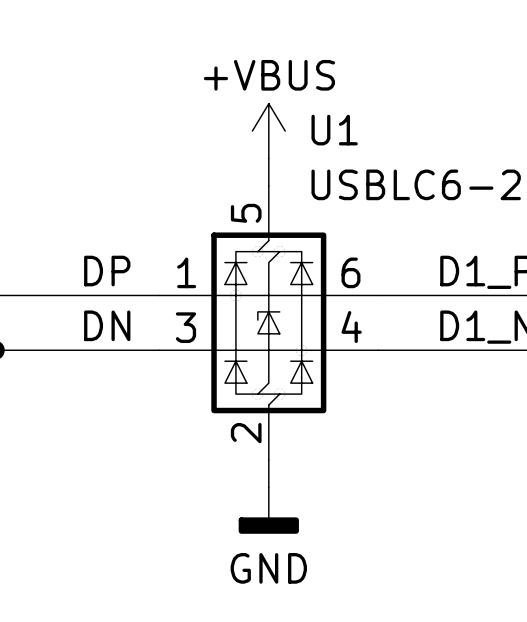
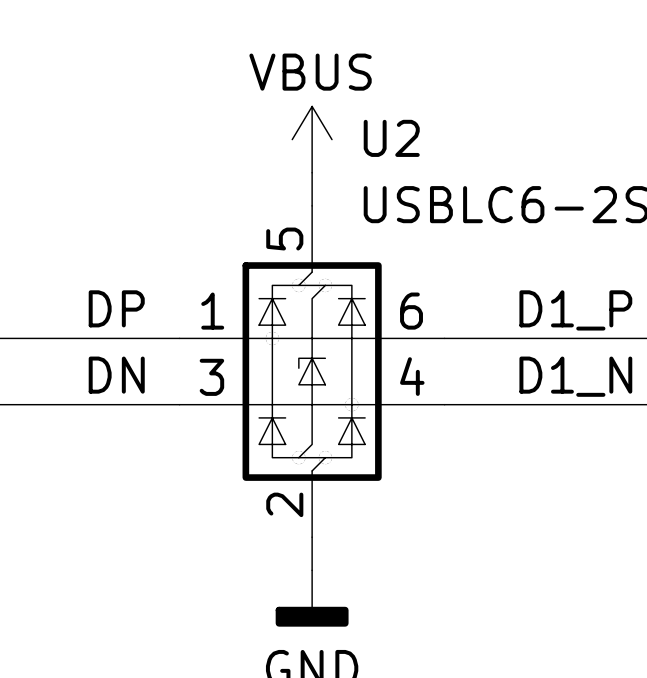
U1 name: U1 (334, 130) -> U2 (391, 138)
power symbol: +VBUS (268, 131) -> VBUS (312, 139)

